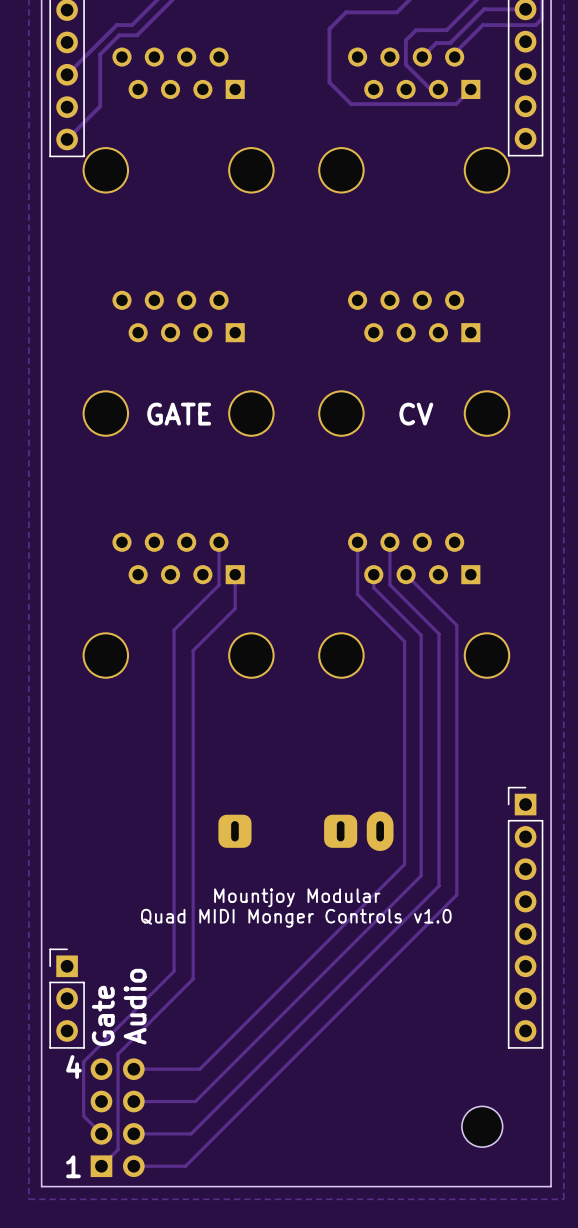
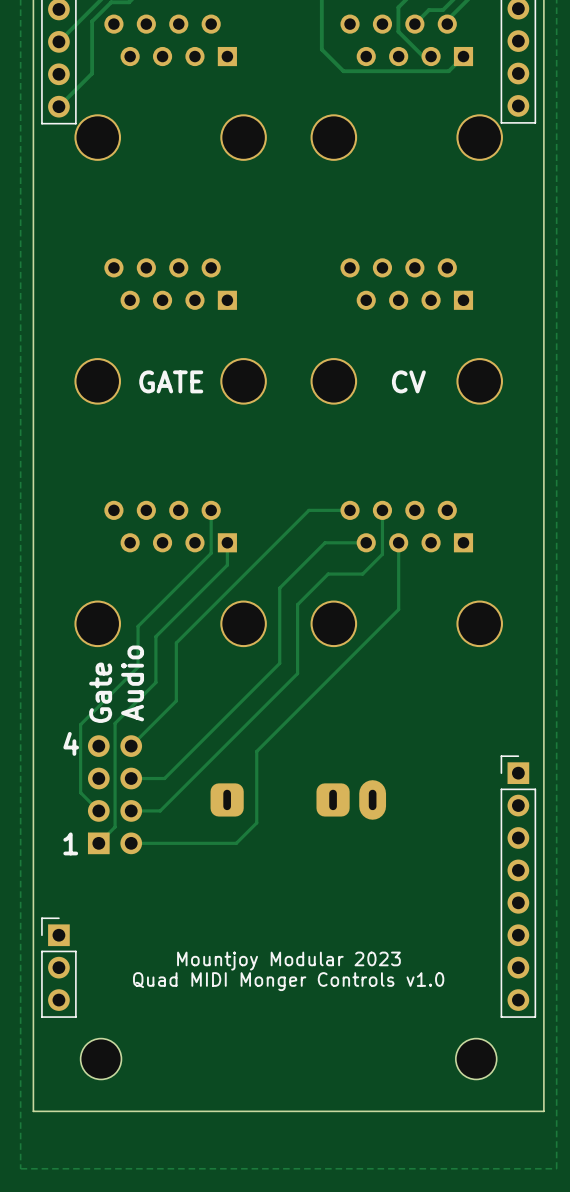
track: (357, 542) (357, 594) (404, 641) (404, 864) (199, 1069) (133, 1069) -> (350, 510) (308, 510) (176, 642) (176, 700) (131, 746)
track: (373, 574) (373, 587) (421, 635) (421, 875) (195, 1101) (133, 1101) -> (366, 542) (325, 542) (279, 588) (279, 663) (164, 778) (131, 778)
track: (406, 574) (456, 625) (456, 894) (185, 1166) (133, 1166) -> (398, 542) (398, 609) (256, 751) (256, 822) (236, 843) (131, 843)
track: (389, 584) (438, 633) (438, 886) (191, 1133) (133, 1133) -> (382, 552) (362, 574) (328, 574) (297, 604) (297, 673) (160, 810) (131, 810)
track: (235, 596) (235, 608) (193, 650) (193, 979) (118, 1054) (118, 1149) (101, 1166) -> (227, 565) (155, 636) (155, 682) (115, 723) (115, 827) (98, 843)
track: (174, 630) (174, 971) (83, 1061) (83, 1116) (101, 1133) -> (166, 598) (138, 626) (138, 667) (80, 724) (80, 792) (98, 810)
text: Mountjoy Modular (297, 897) -> none
text position: Quad MIDI Monger Controls v1.0 (296, 918) -> Quad MIDI Monger Controls v1.0 (288, 981)
text: none -> Mountjoy Modular 2023 (288, 961)
text position: Audio (135, 1006) -> Audio (132, 683)
text position: Gate (103, 1015) -> Gate (100, 692)
text position: 4 (73, 1066) -> 4 (71, 743)
part: none -> (101, 1059)
part position: (117, 1117) -> (115, 794)
part position: (482, 1126) -> (476, 1059)
board edge: (551, 1142) (551, 1186) (41, 1186) (41, 1142) -> (543, 1111) (33, 1111)
text position: 1 (73, 1166) -> 1 (70, 843)

